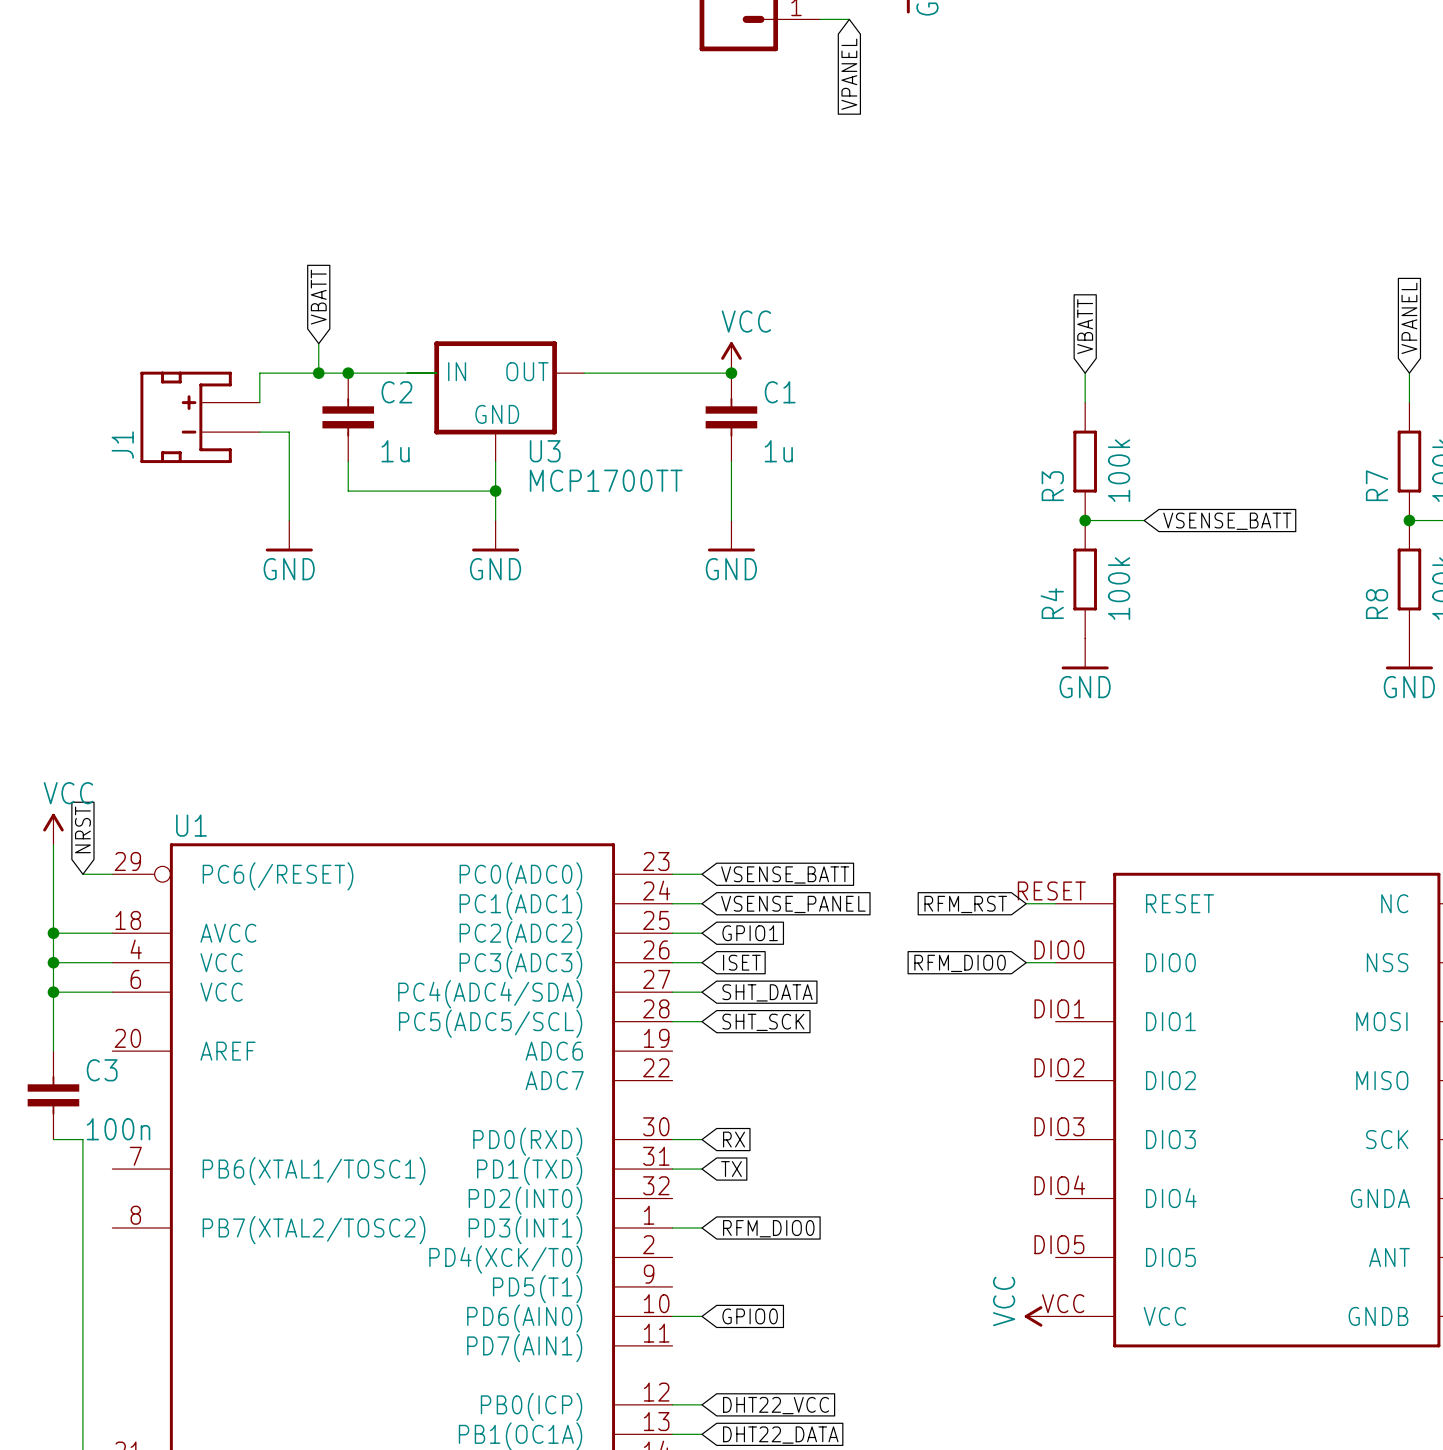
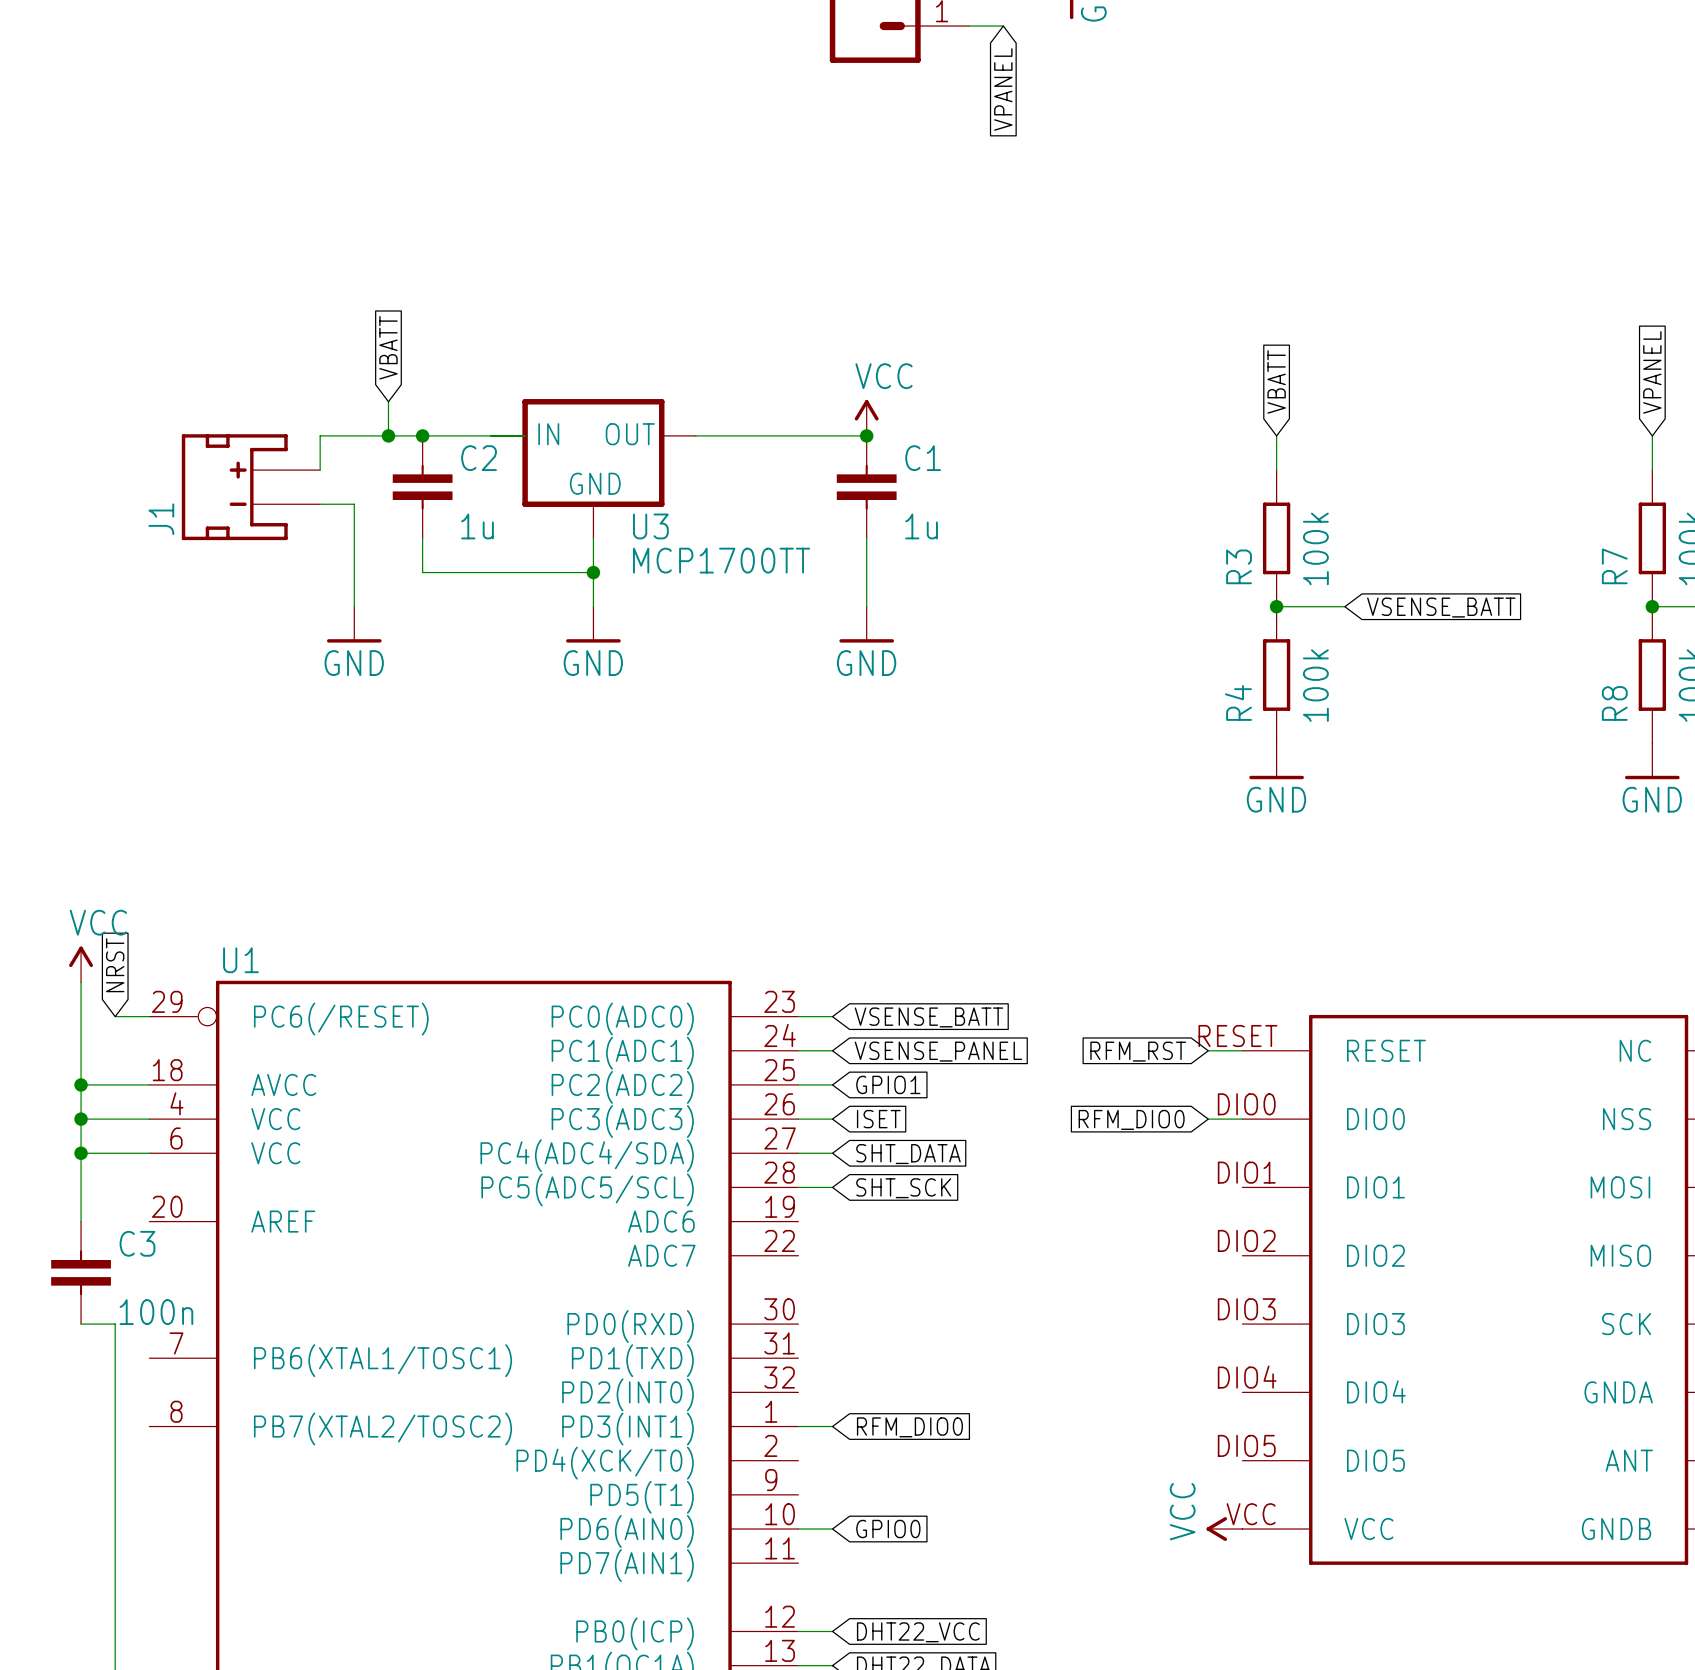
wire: (672, 1139) (701, 1139) -> none
global label: RX (734, 1139) -> none
wire: (672, 1169) (701, 1169) -> none
global label: TX (731, 1169) -> none

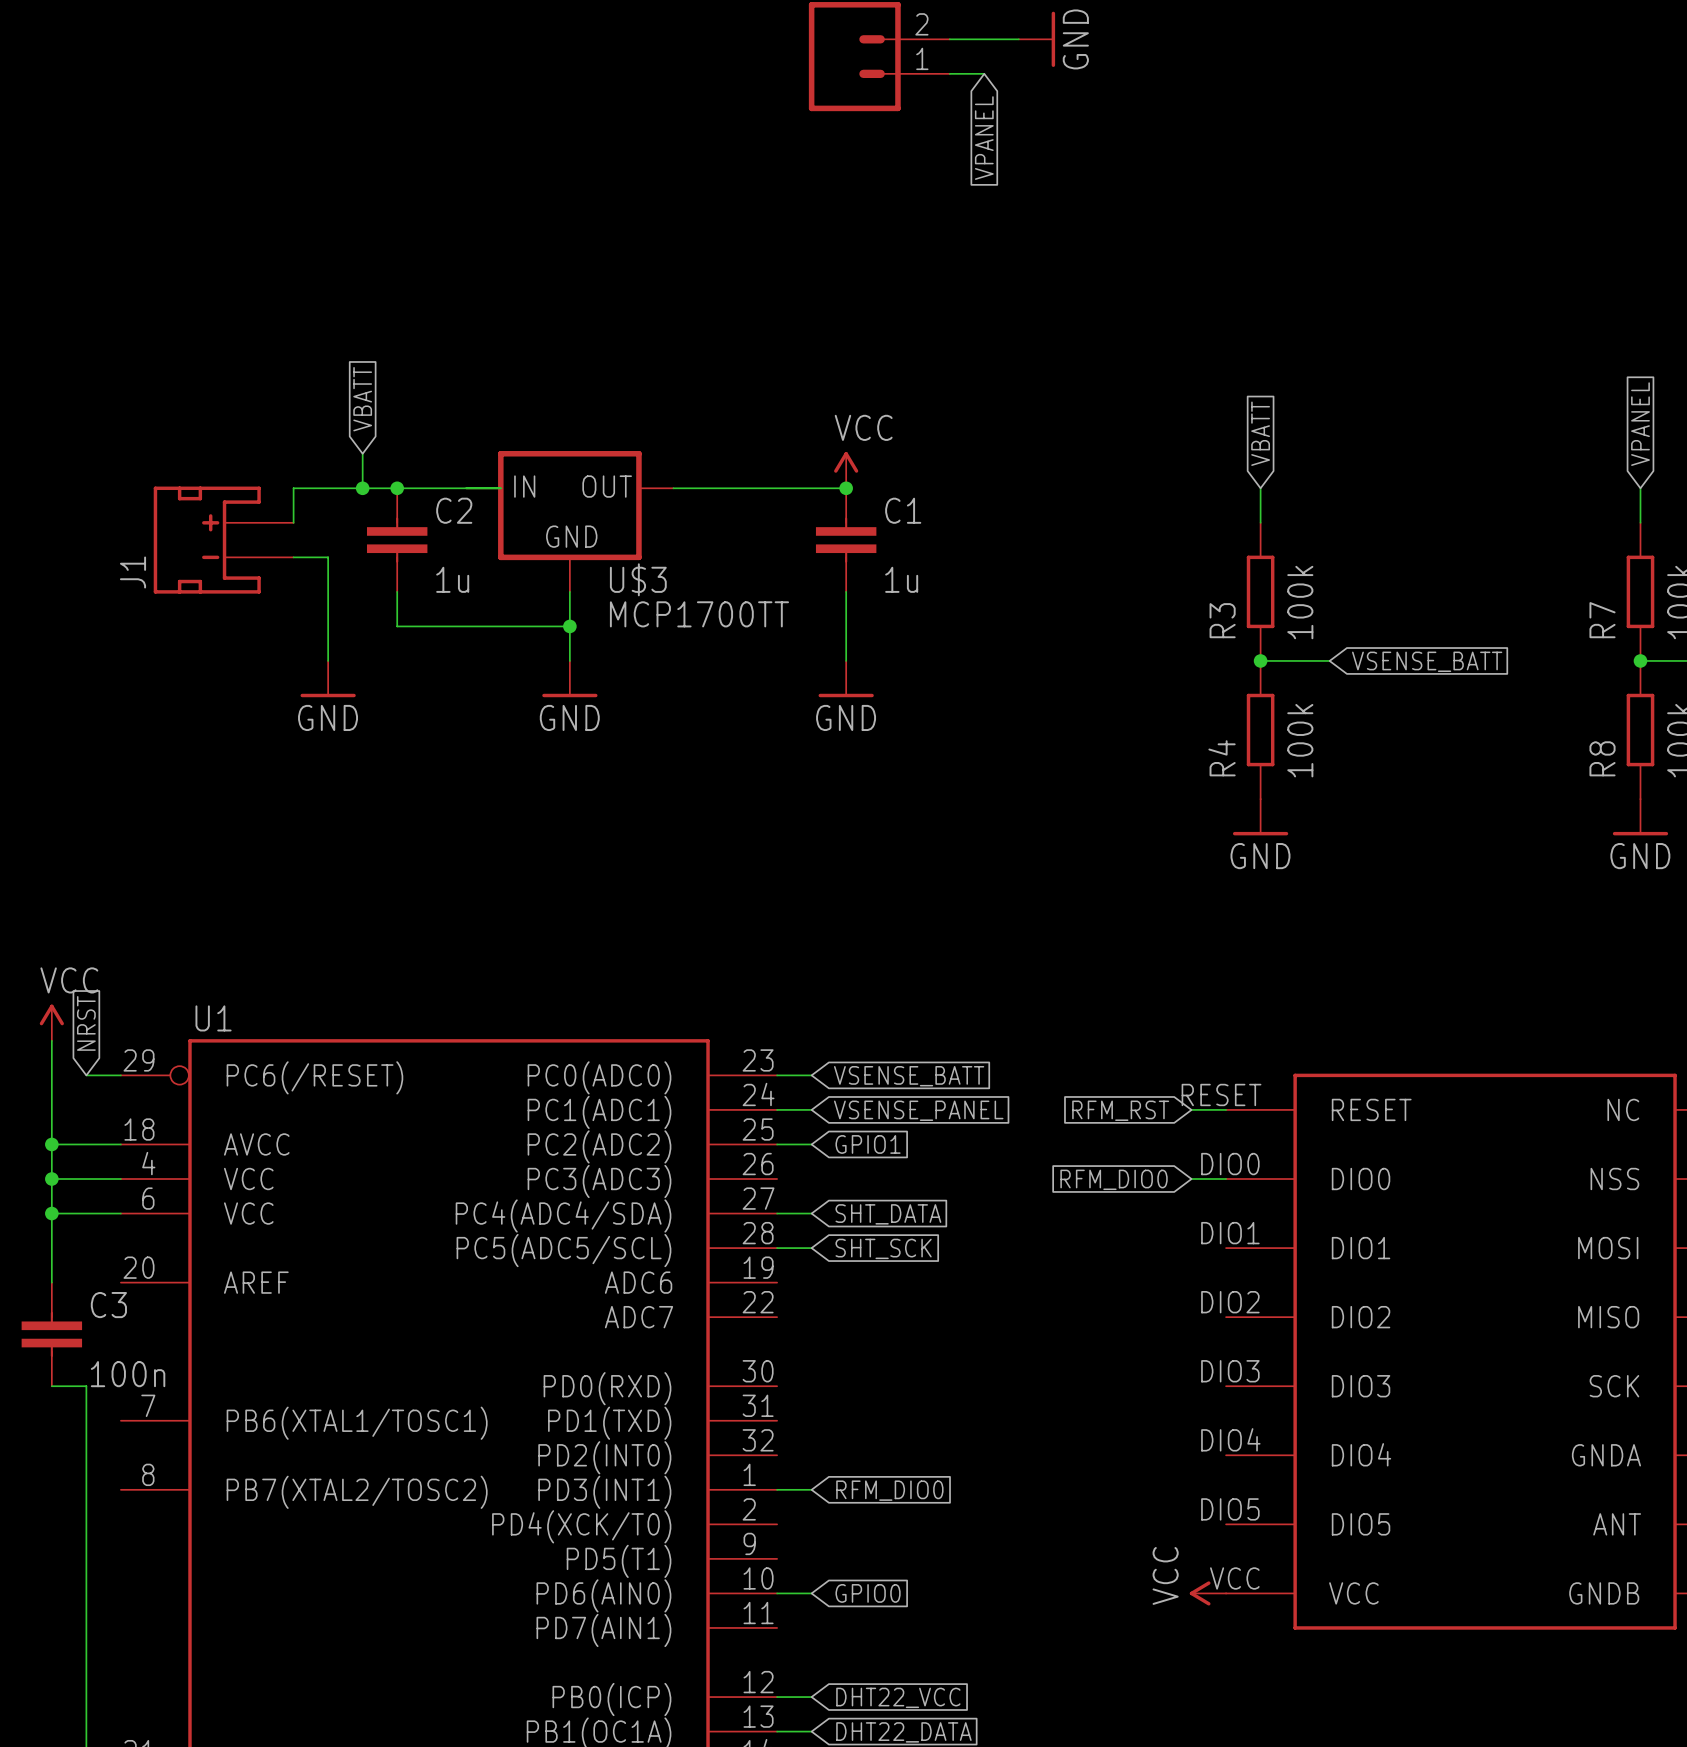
U3 name: U3 (650, 526) -> U$3 (638, 579)
wire: (798, 1119) (832, 1119) -> none
global label: ISET (878, 1119) -> none

